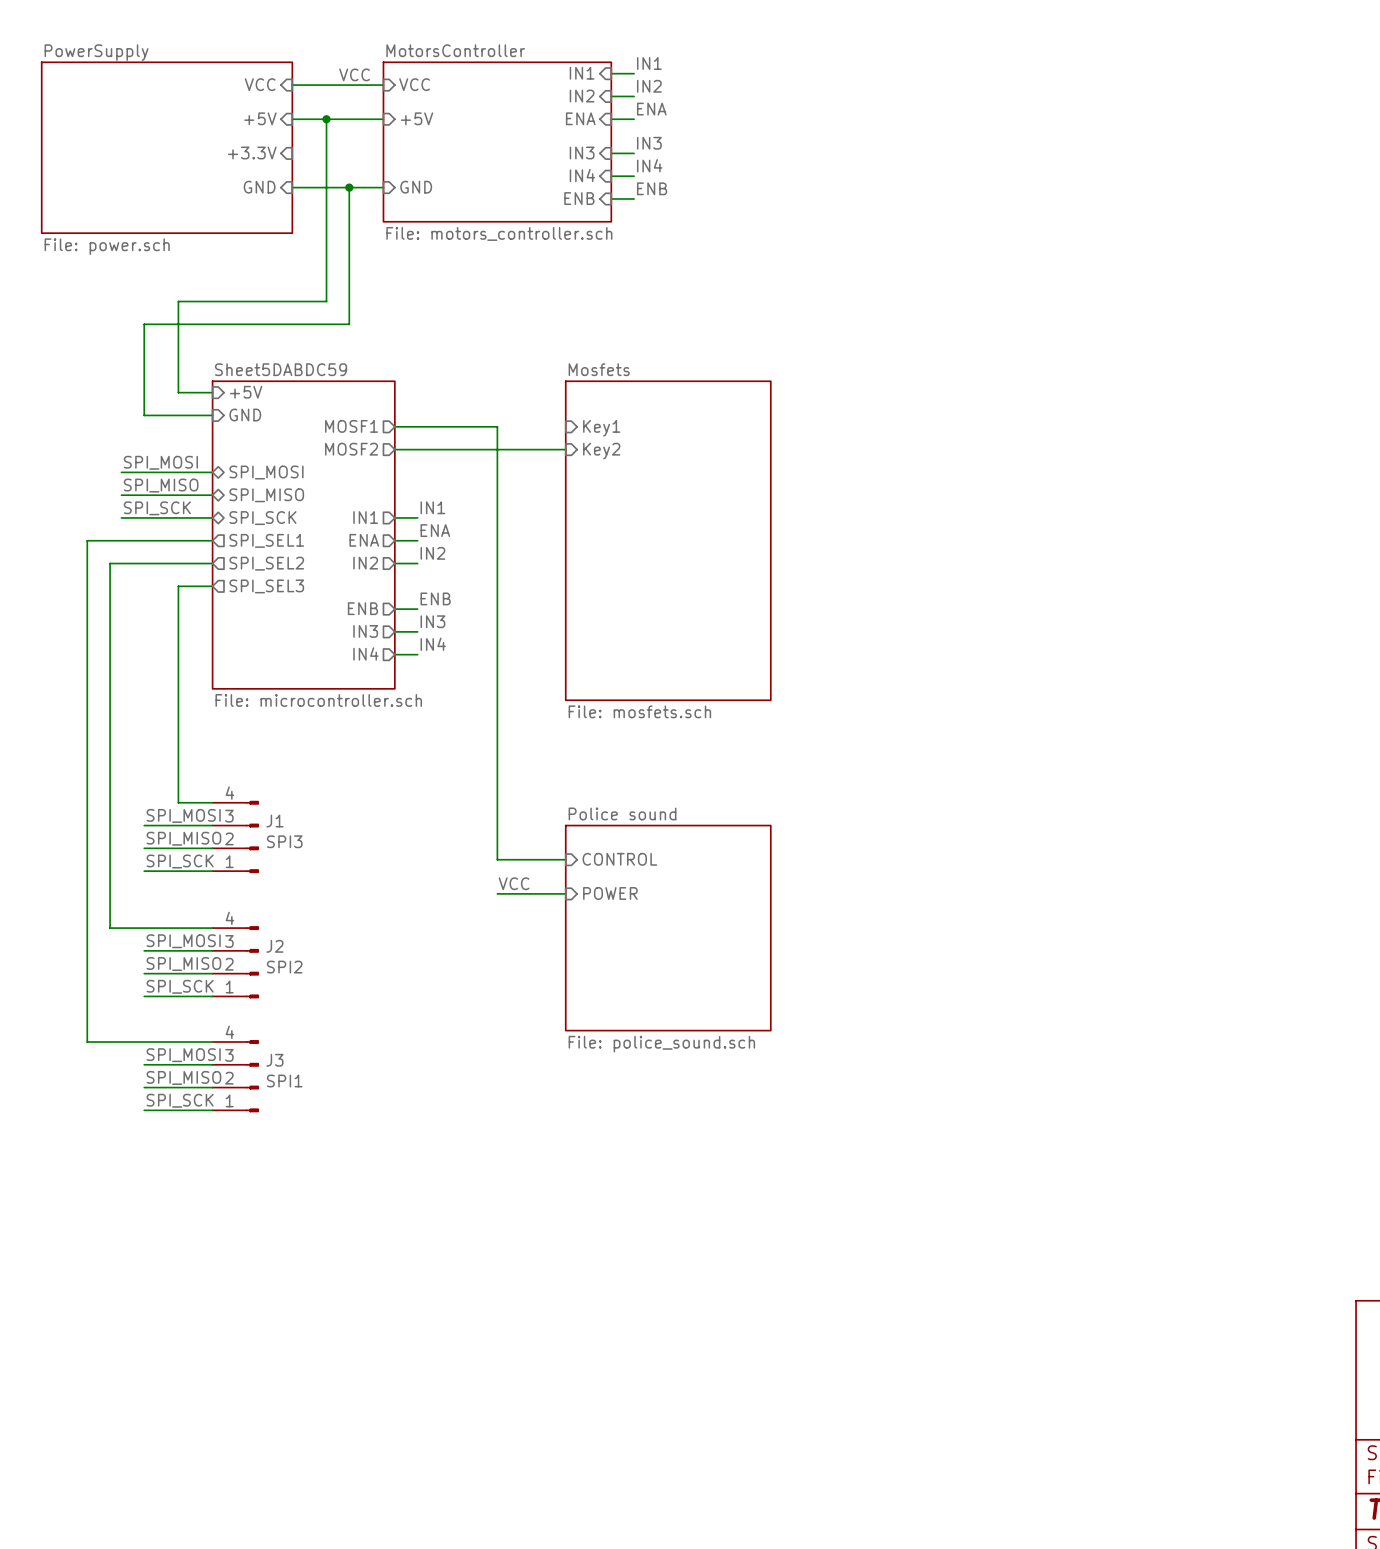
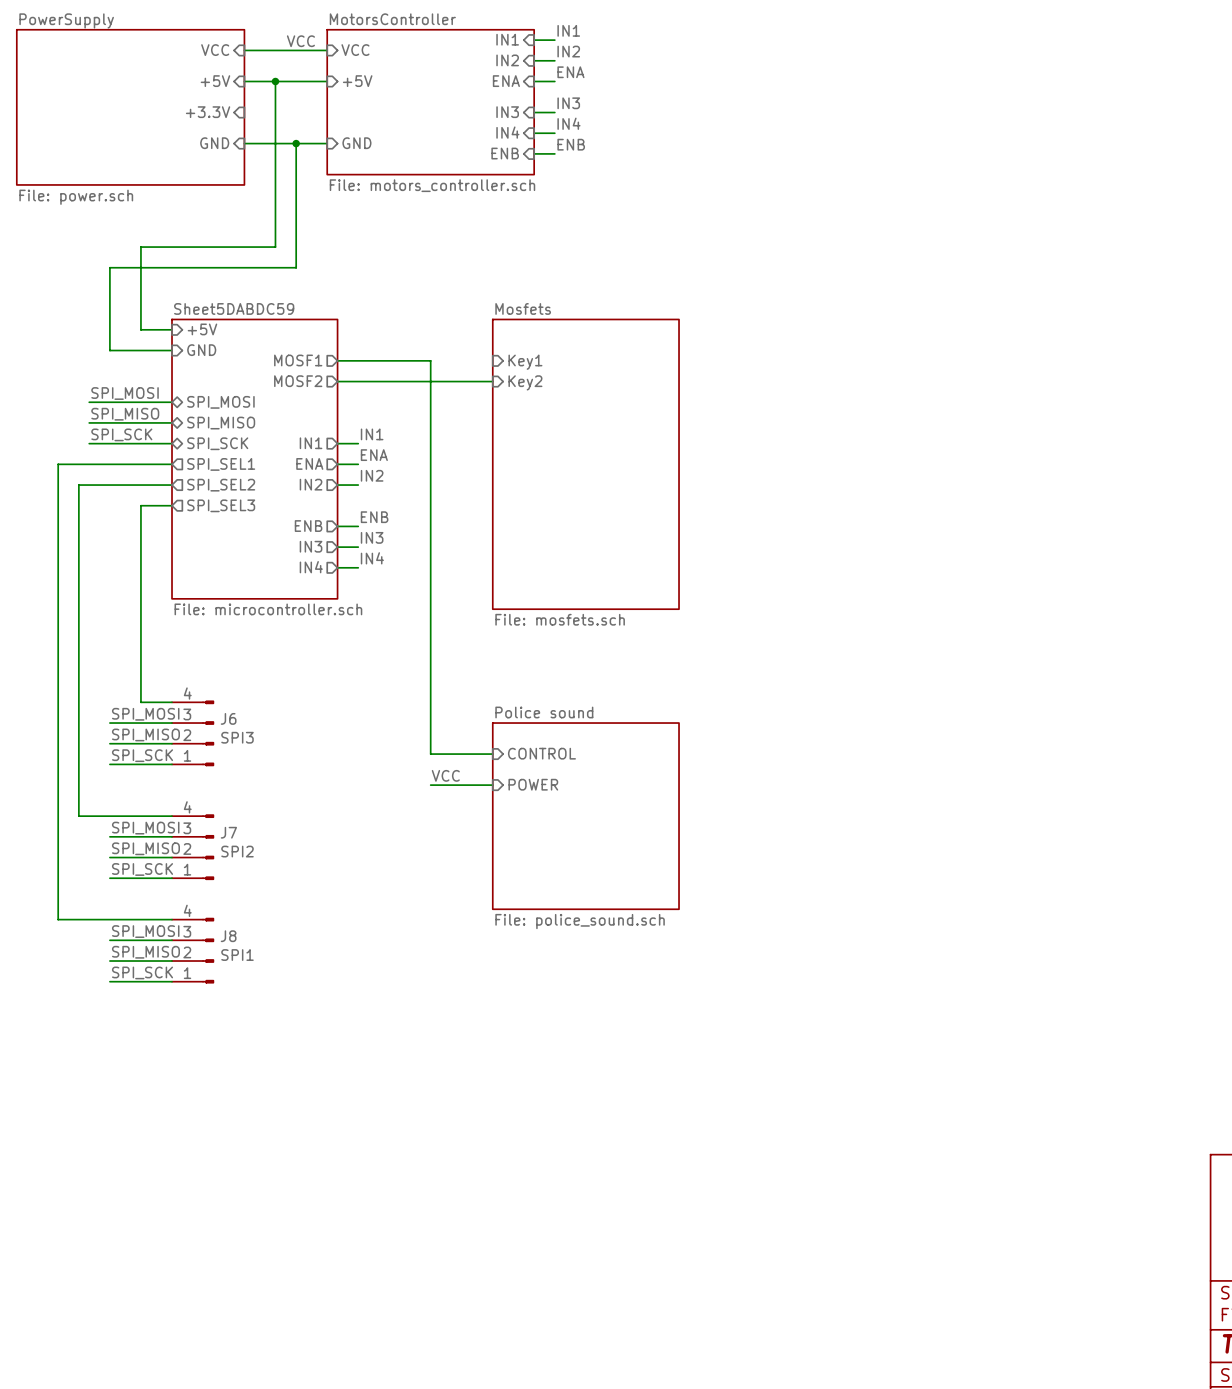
J1 name: J1 (274, 821) -> J6 (228, 718)
J2 name: J2 (274, 946) -> J7 (228, 832)
J3 name: J3 (274, 1060) -> J8 (228, 936)

